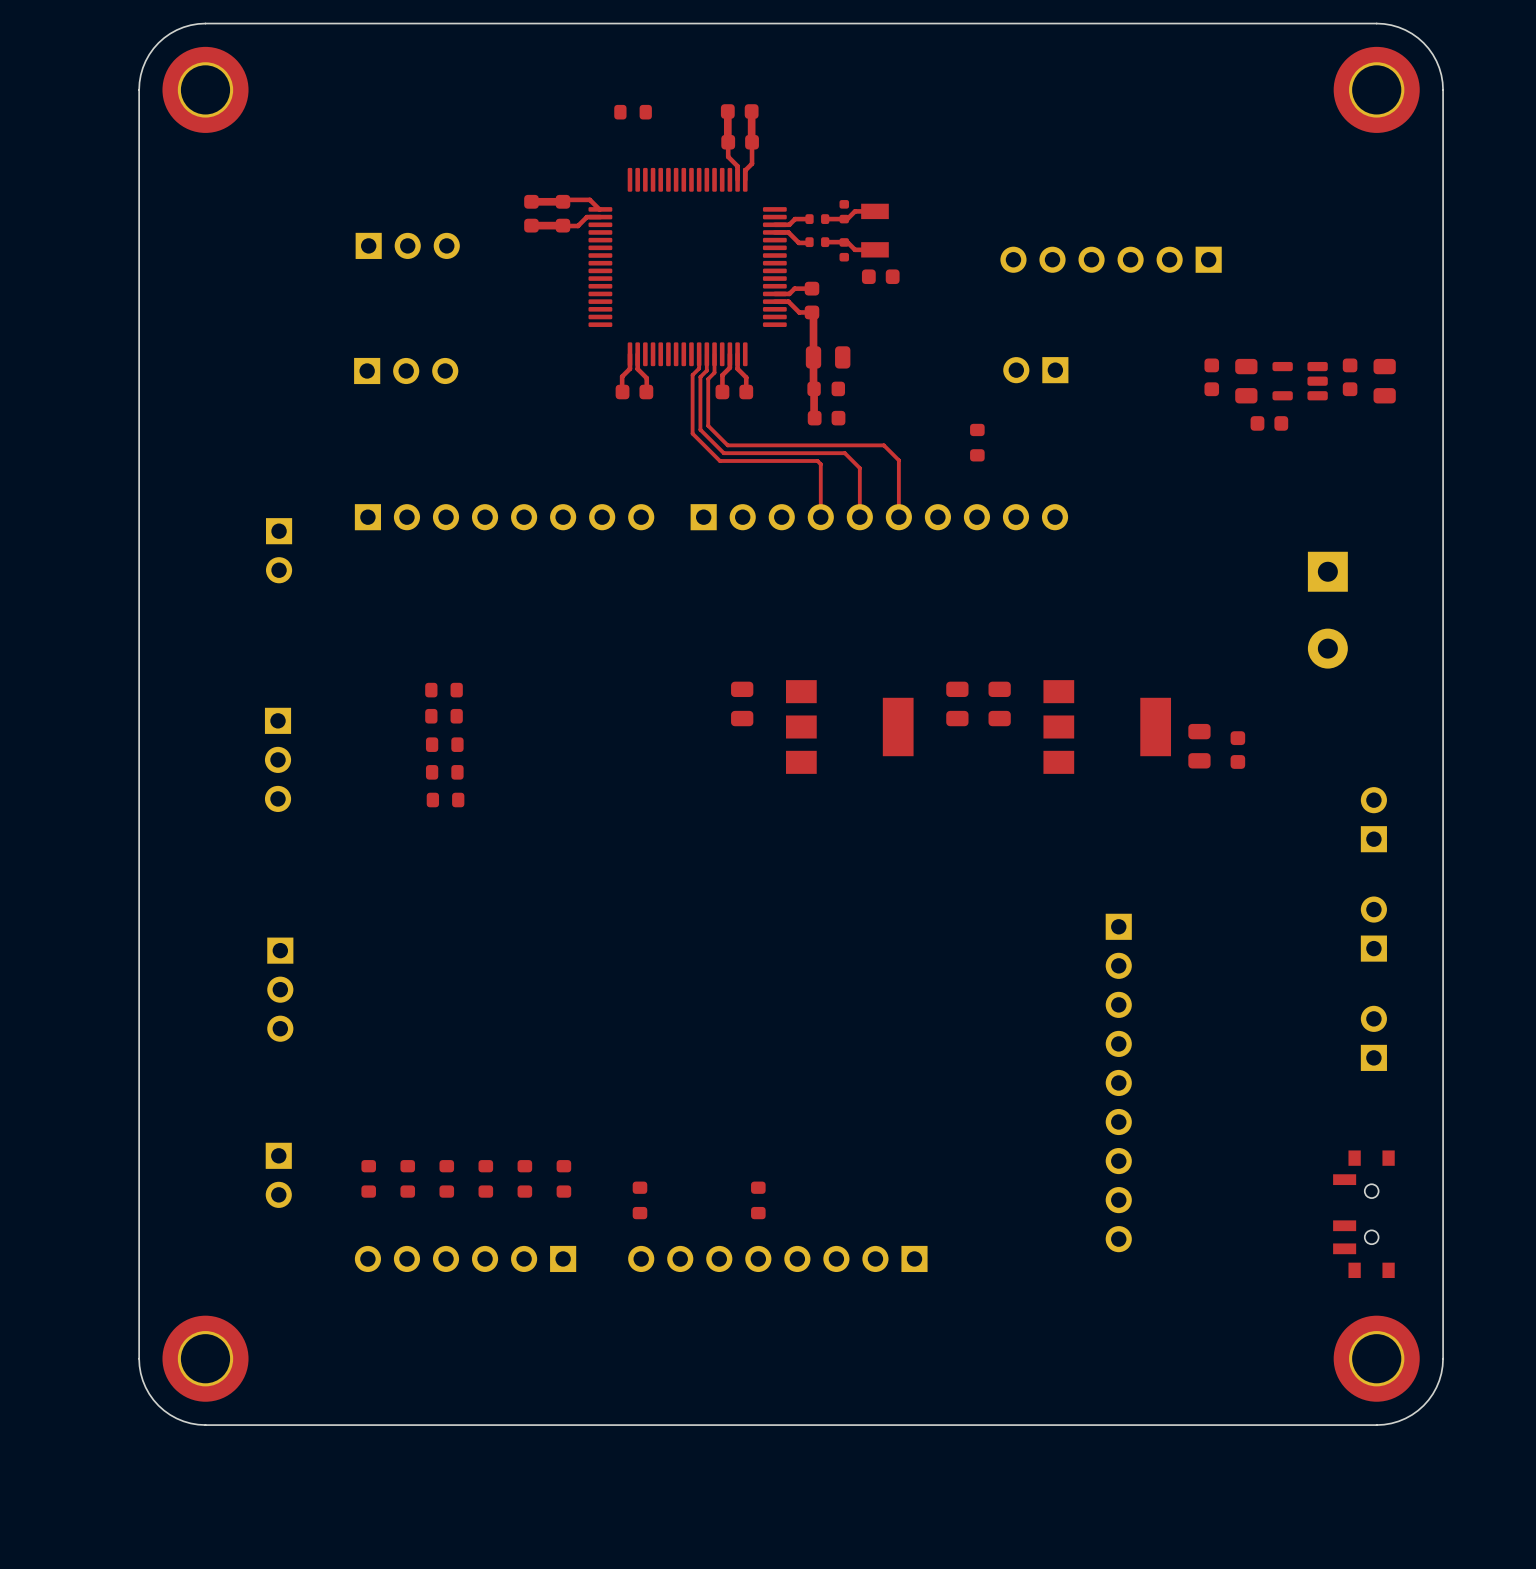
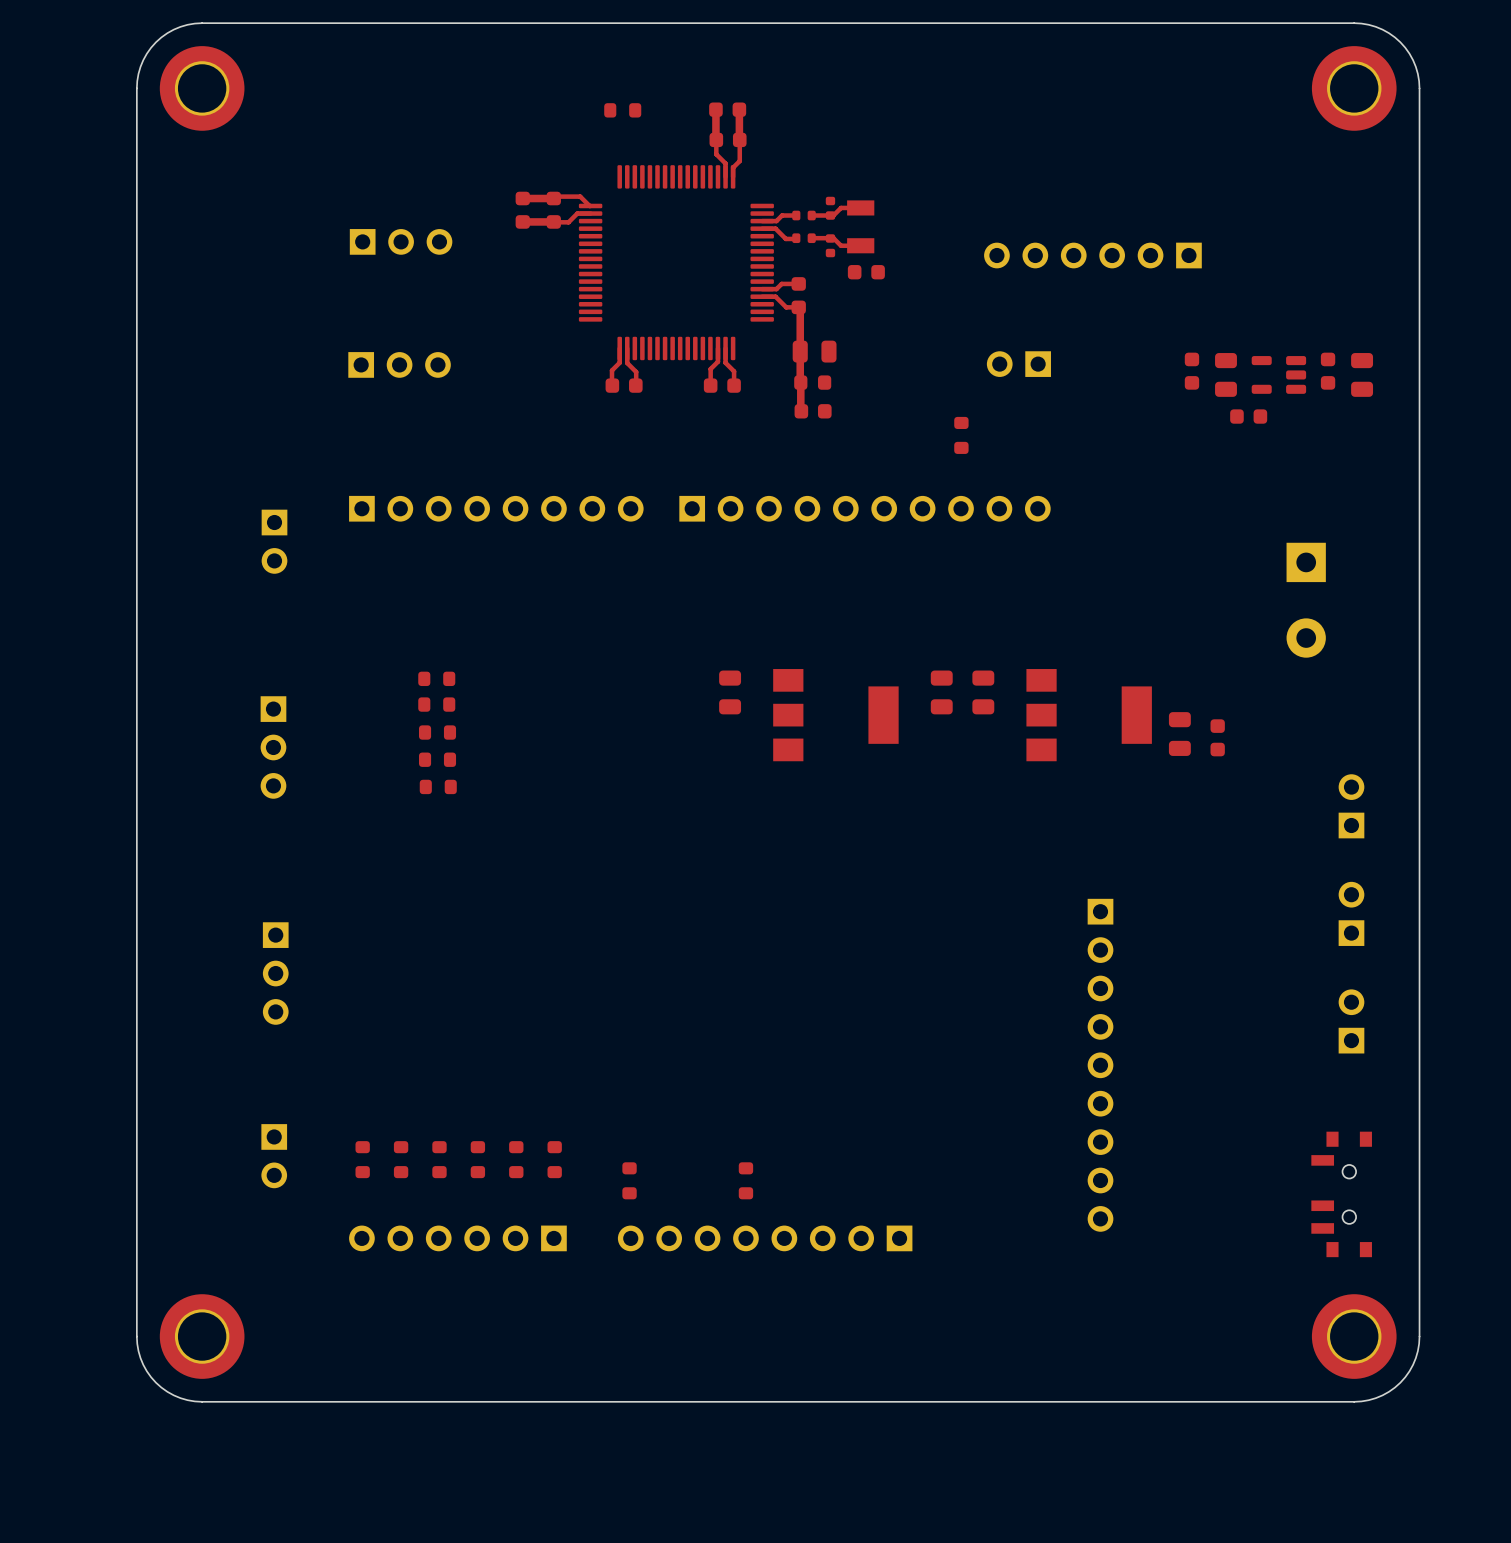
top track: (699, 354) (699, 368) (692, 375) (692, 433) (719, 460) (817, 460) (820, 464) (820, 517) -> none
top track: (706, 354) (706, 370) (700, 377) (700, 429) (723, 453) (844, 453) (859, 468) (859, 517) -> none
top track: (714, 354) (714, 372) (708, 379) (708, 425) (727, 445) (883, 445) (898, 460) (898, 517) -> none

